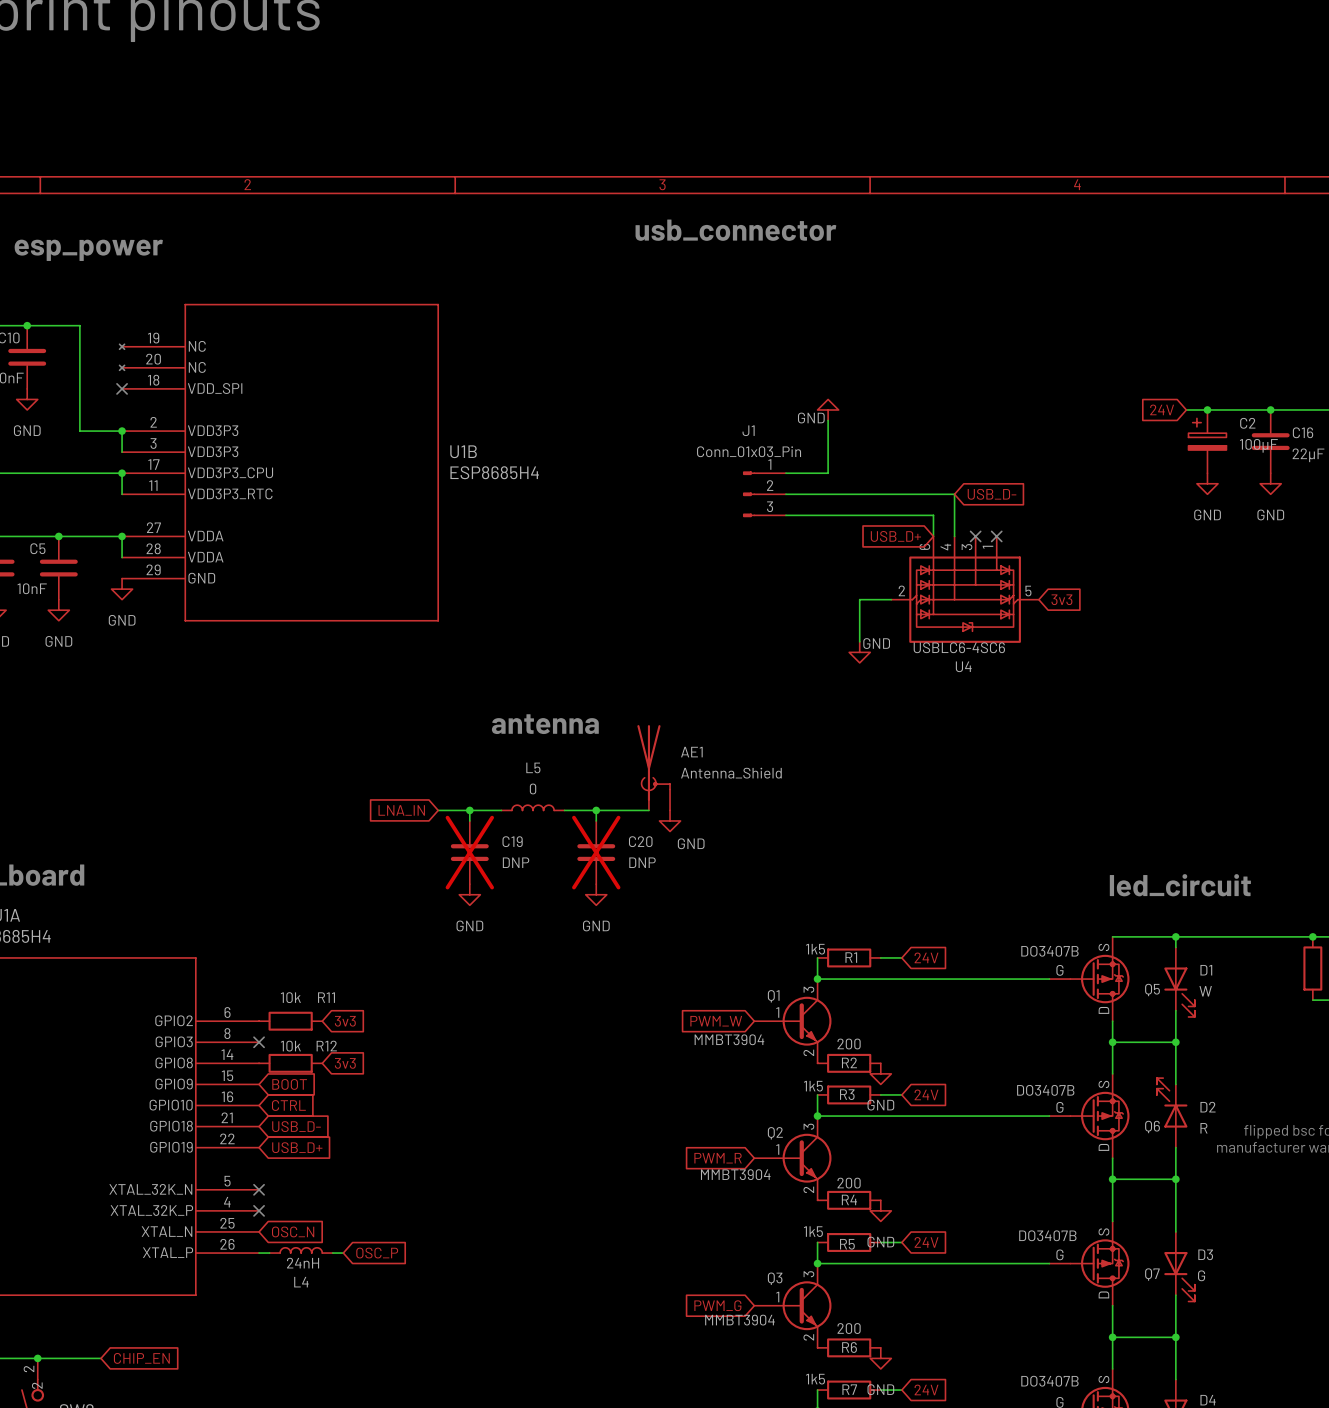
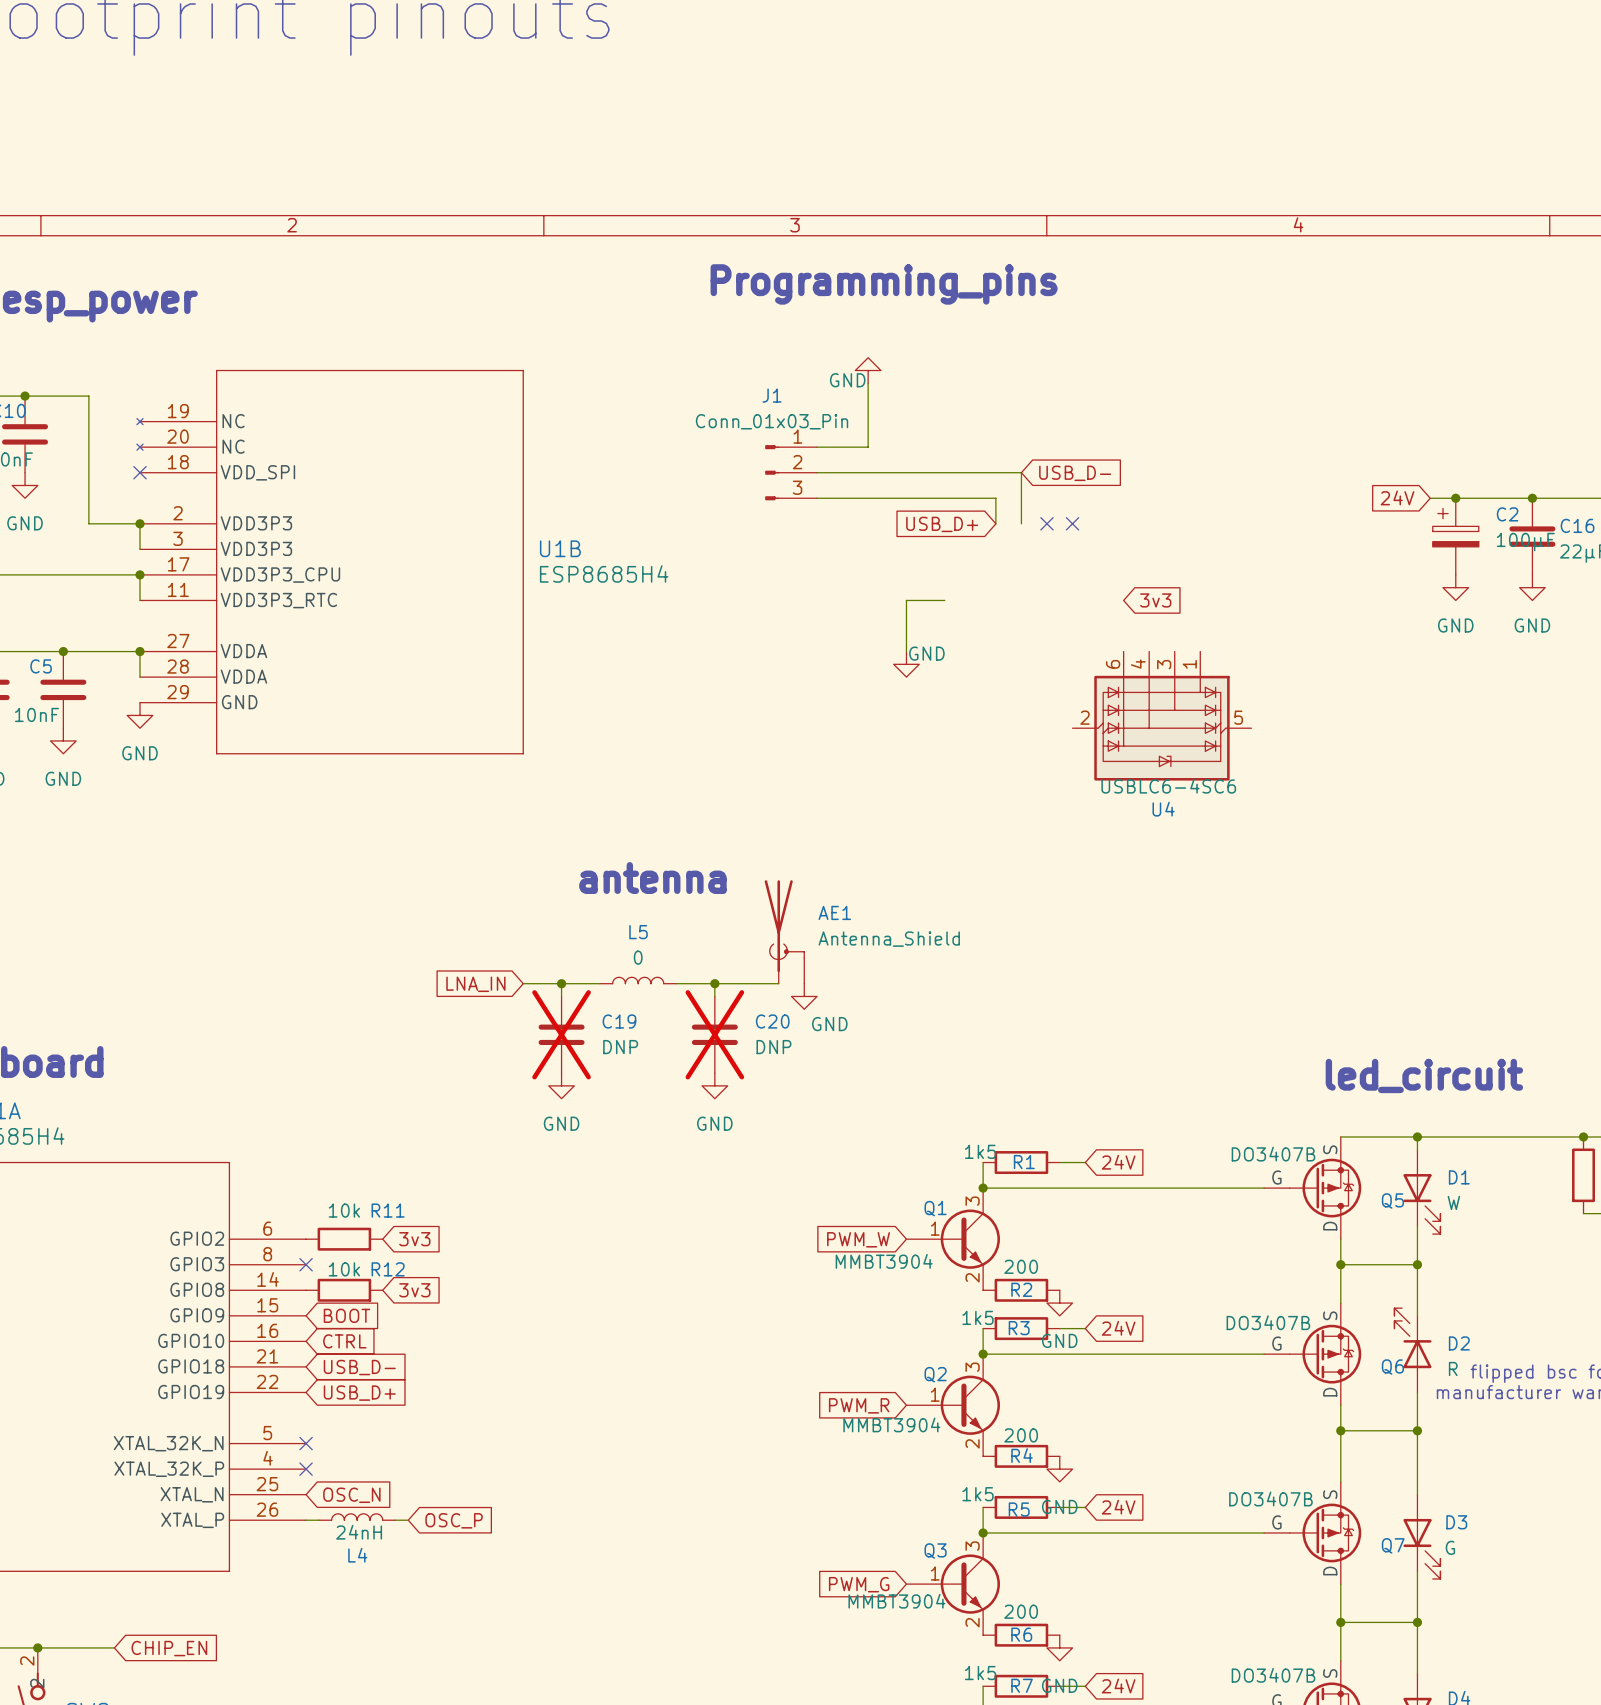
text: usb_connector (735, 230) -> Programming_pins (884, 284)
power symbol: none -> GND (868, 370)
wire: none -> (868, 383) (868, 447) (817, 447)
wire: none -> (817, 472) (1021, 472) (1021, 523)
wire: none -> (817, 498) (995, 498) (995, 511)
power symbol: GND (828, 409) -> none
wire: (828, 431) (828, 473) (785, 473) -> none
no-connect mark: none -> (1046, 523)
no-connect mark: none -> (1072, 523)
J1 position: (764, 494) -> (791, 472)
wire: (785, 494) (954, 494) (954, 536) -> (944, 600) (906, 600) (906, 651)
global label position: USB_D- (992, 494) -> USB_D- (1075, 473)
wire: (785, 515) (933, 515) (933, 536) -> none
global label position: USB_D+ (895, 536) -> USB_D+ (942, 524)
no-connect mark: (975, 536) -> none
no-connect mark: (996, 536) -> none
power symbol: none -> GND (906, 664)
wire: (891, 599) (859, 599) (859, 641) -> none
global label position: 3v3 (1061, 599) -> 3v3 (1155, 600)
power symbol: GND (859, 652) -> none

